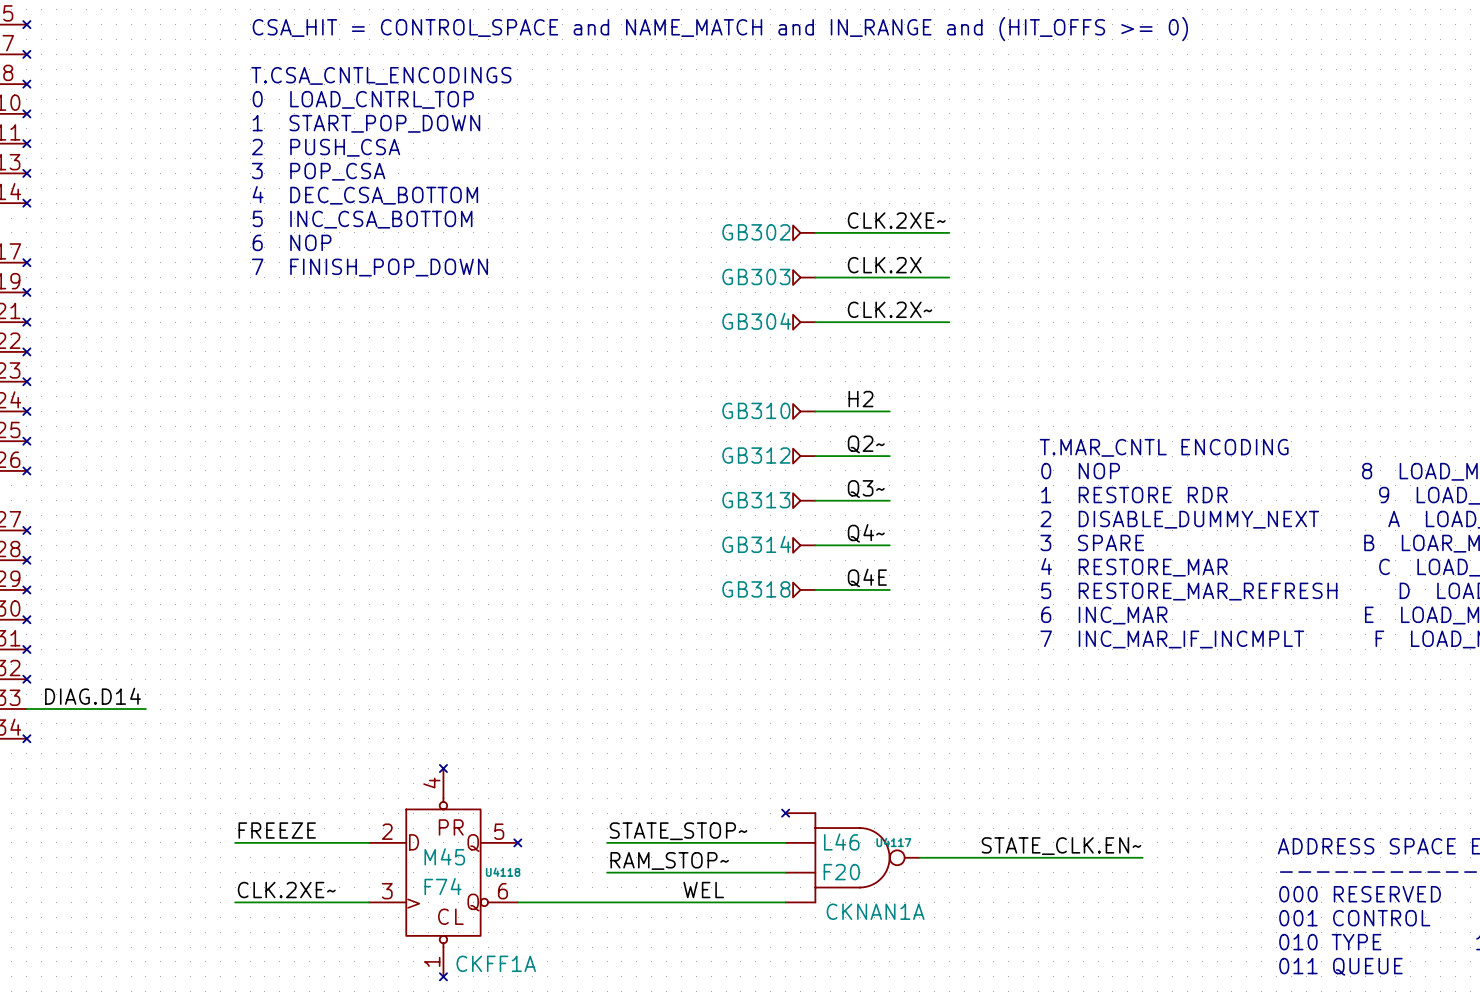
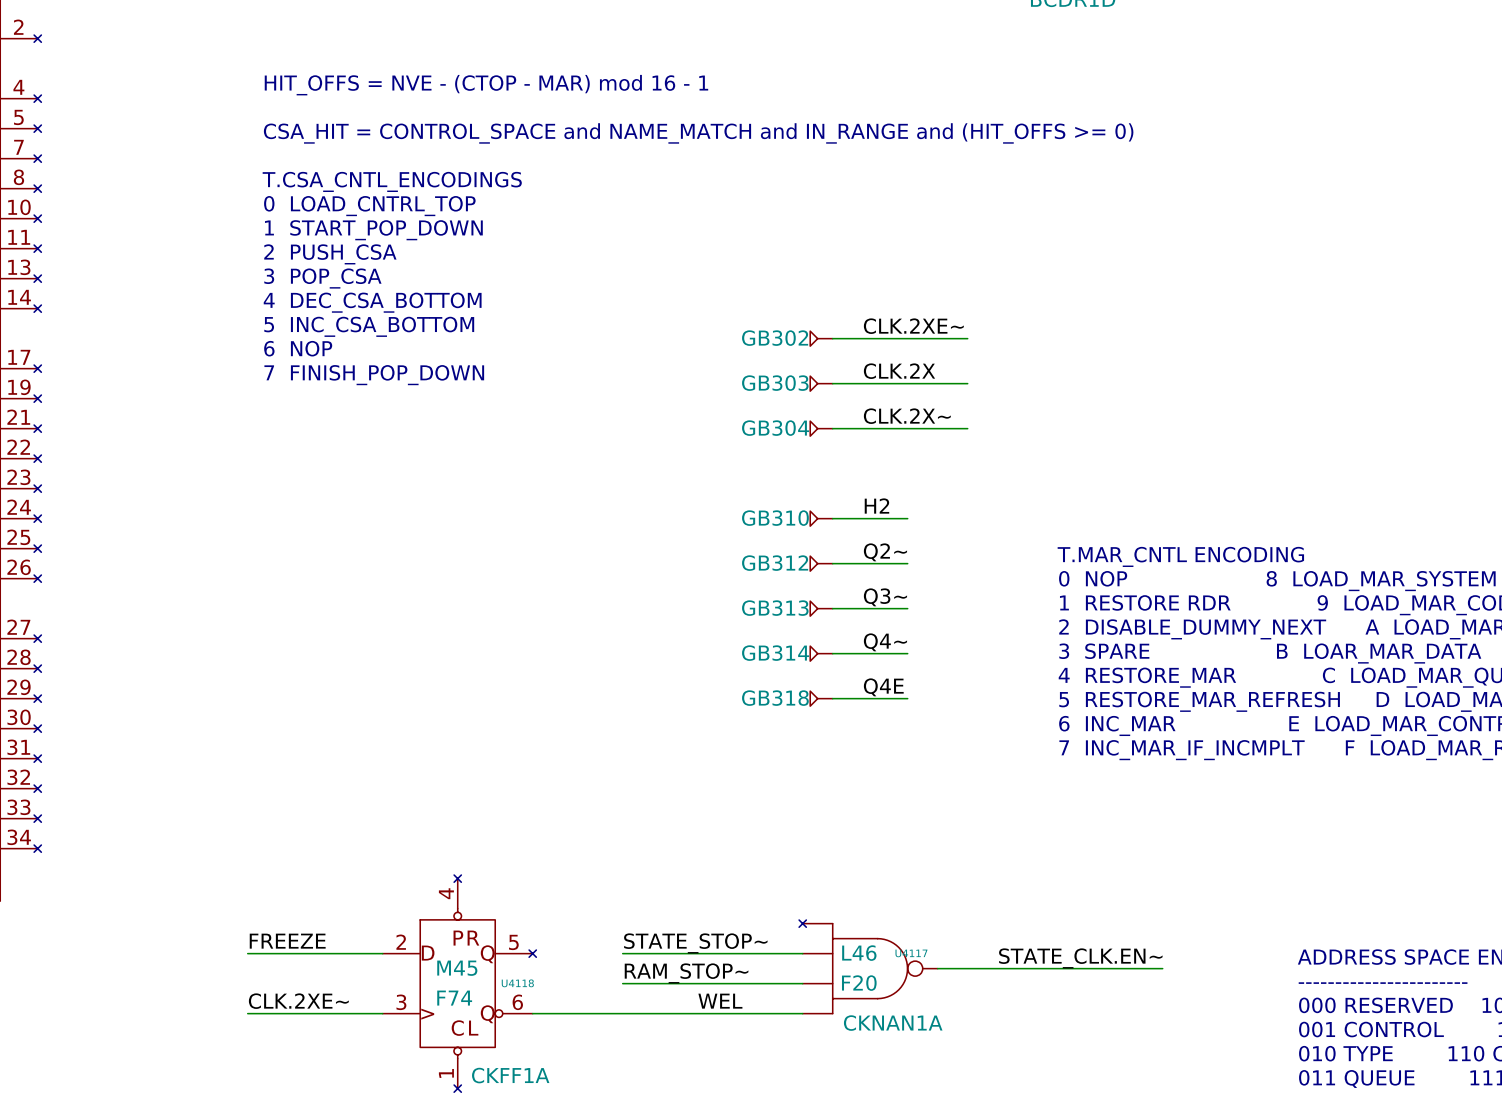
label: DIAG.D14 (92, 696) -> none
wire: (26, 709) (145, 709) -> none
no-connect mark: none -> (37, 818)

